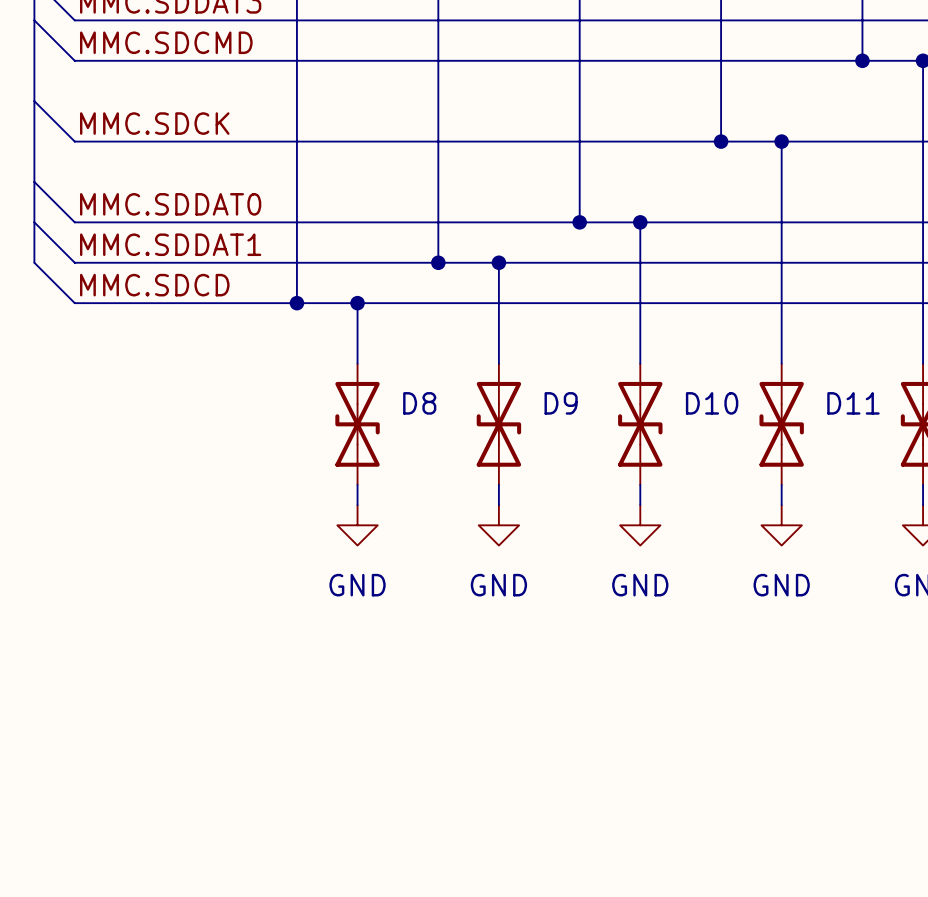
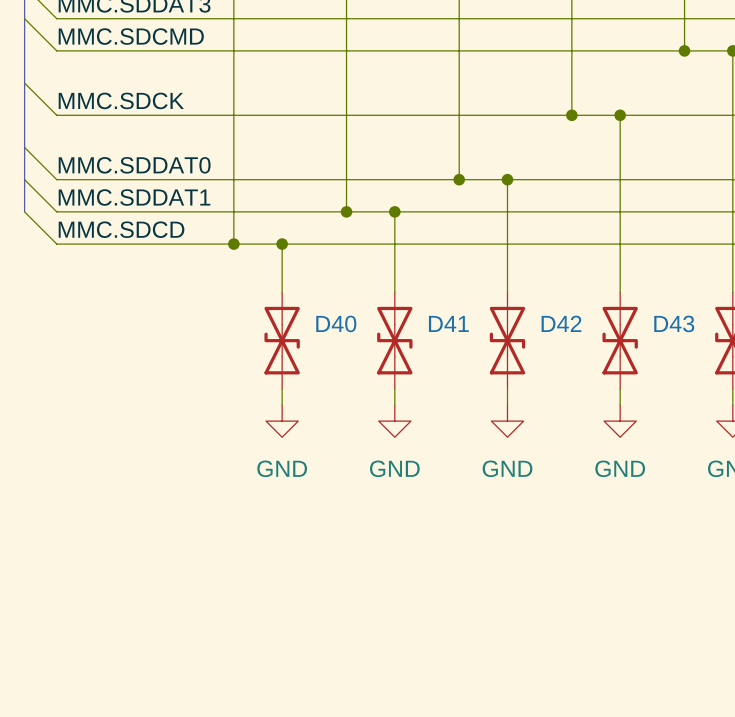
D8 name: D8 (419, 403) -> D40 (336, 323)
D9 name: D9 (561, 403) -> D41 (448, 323)
D10 name: D10 (712, 403) -> D42 (561, 323)
D11 name: D11 (853, 403) -> D43 (674, 323)

